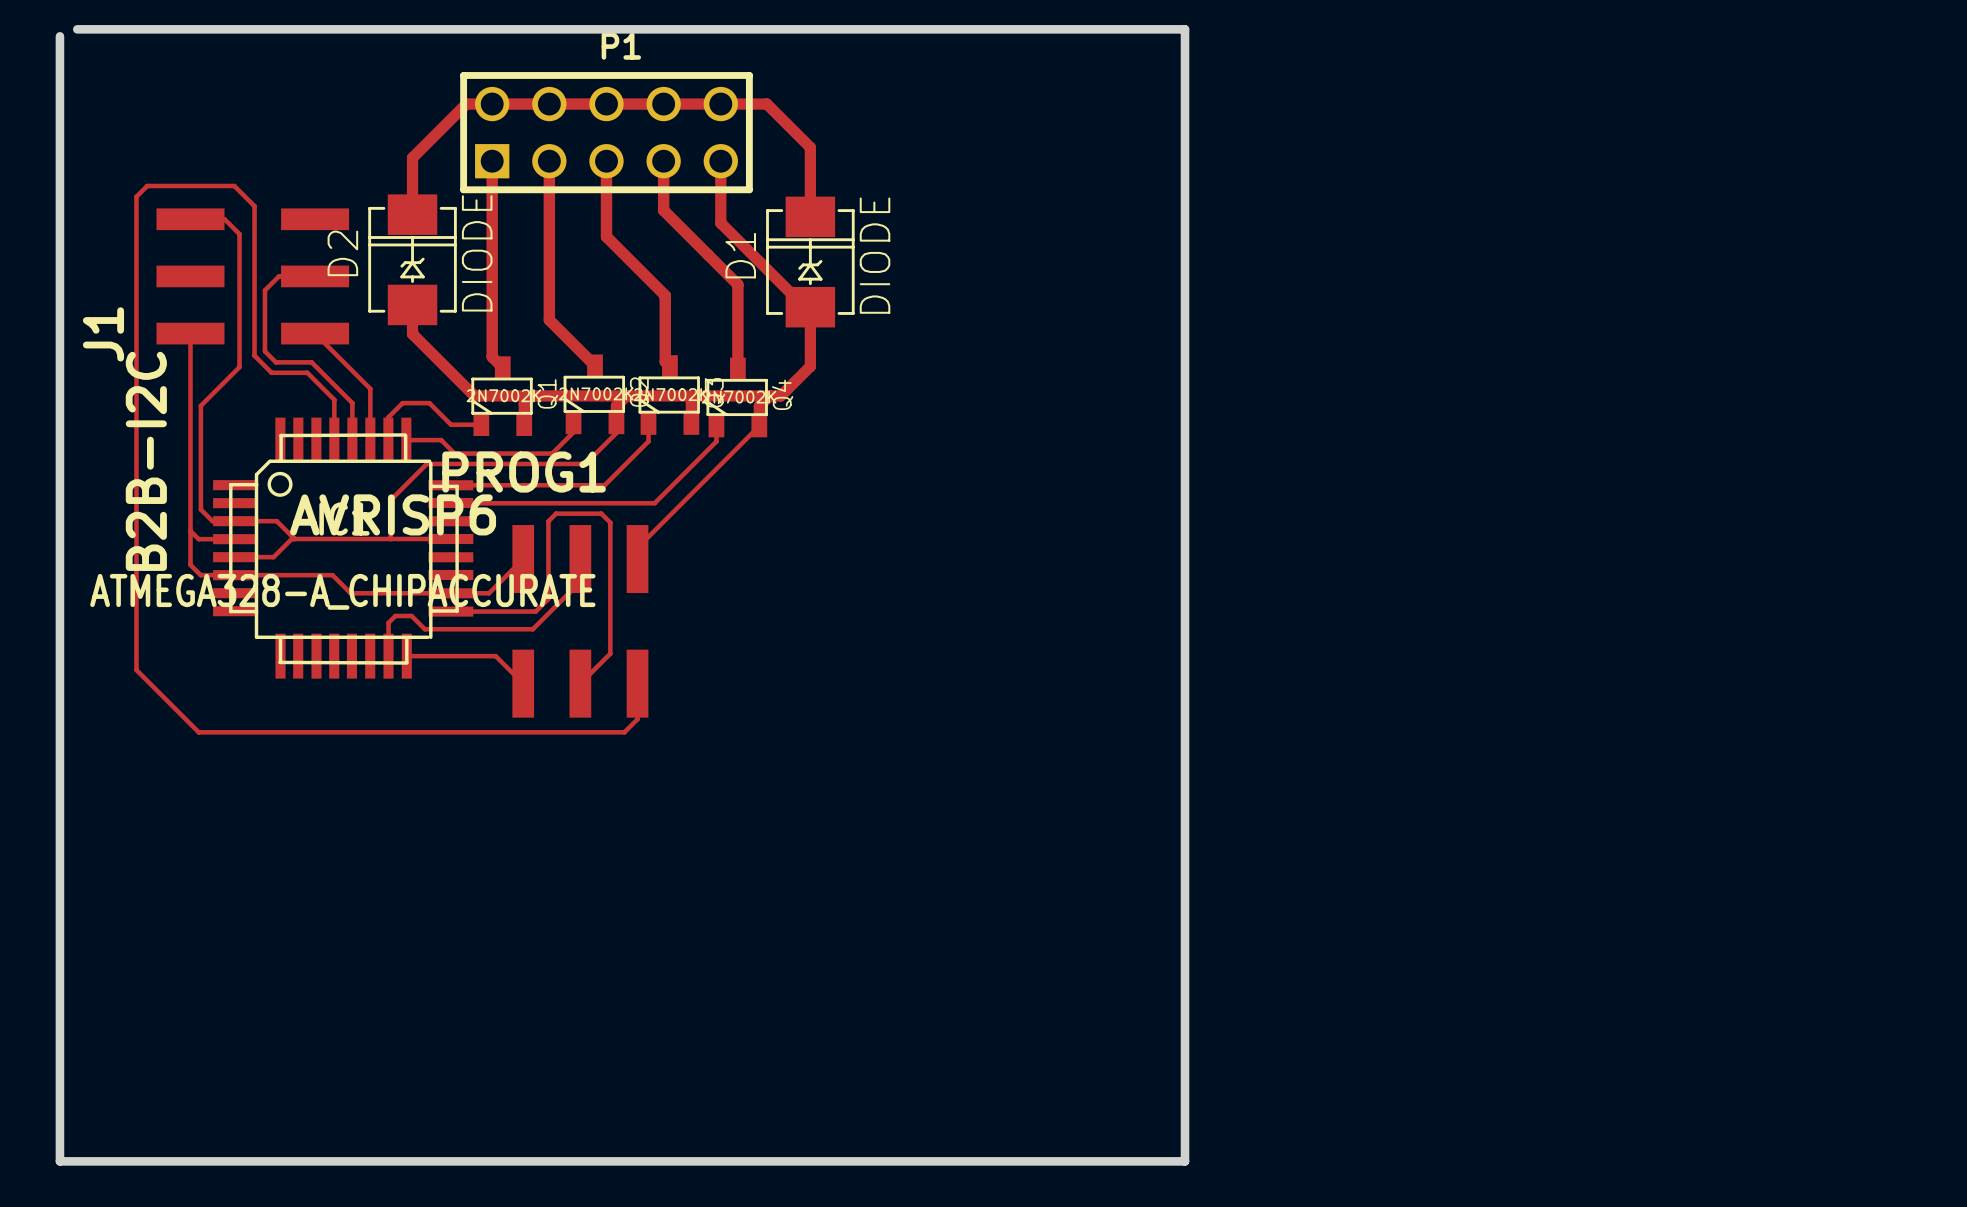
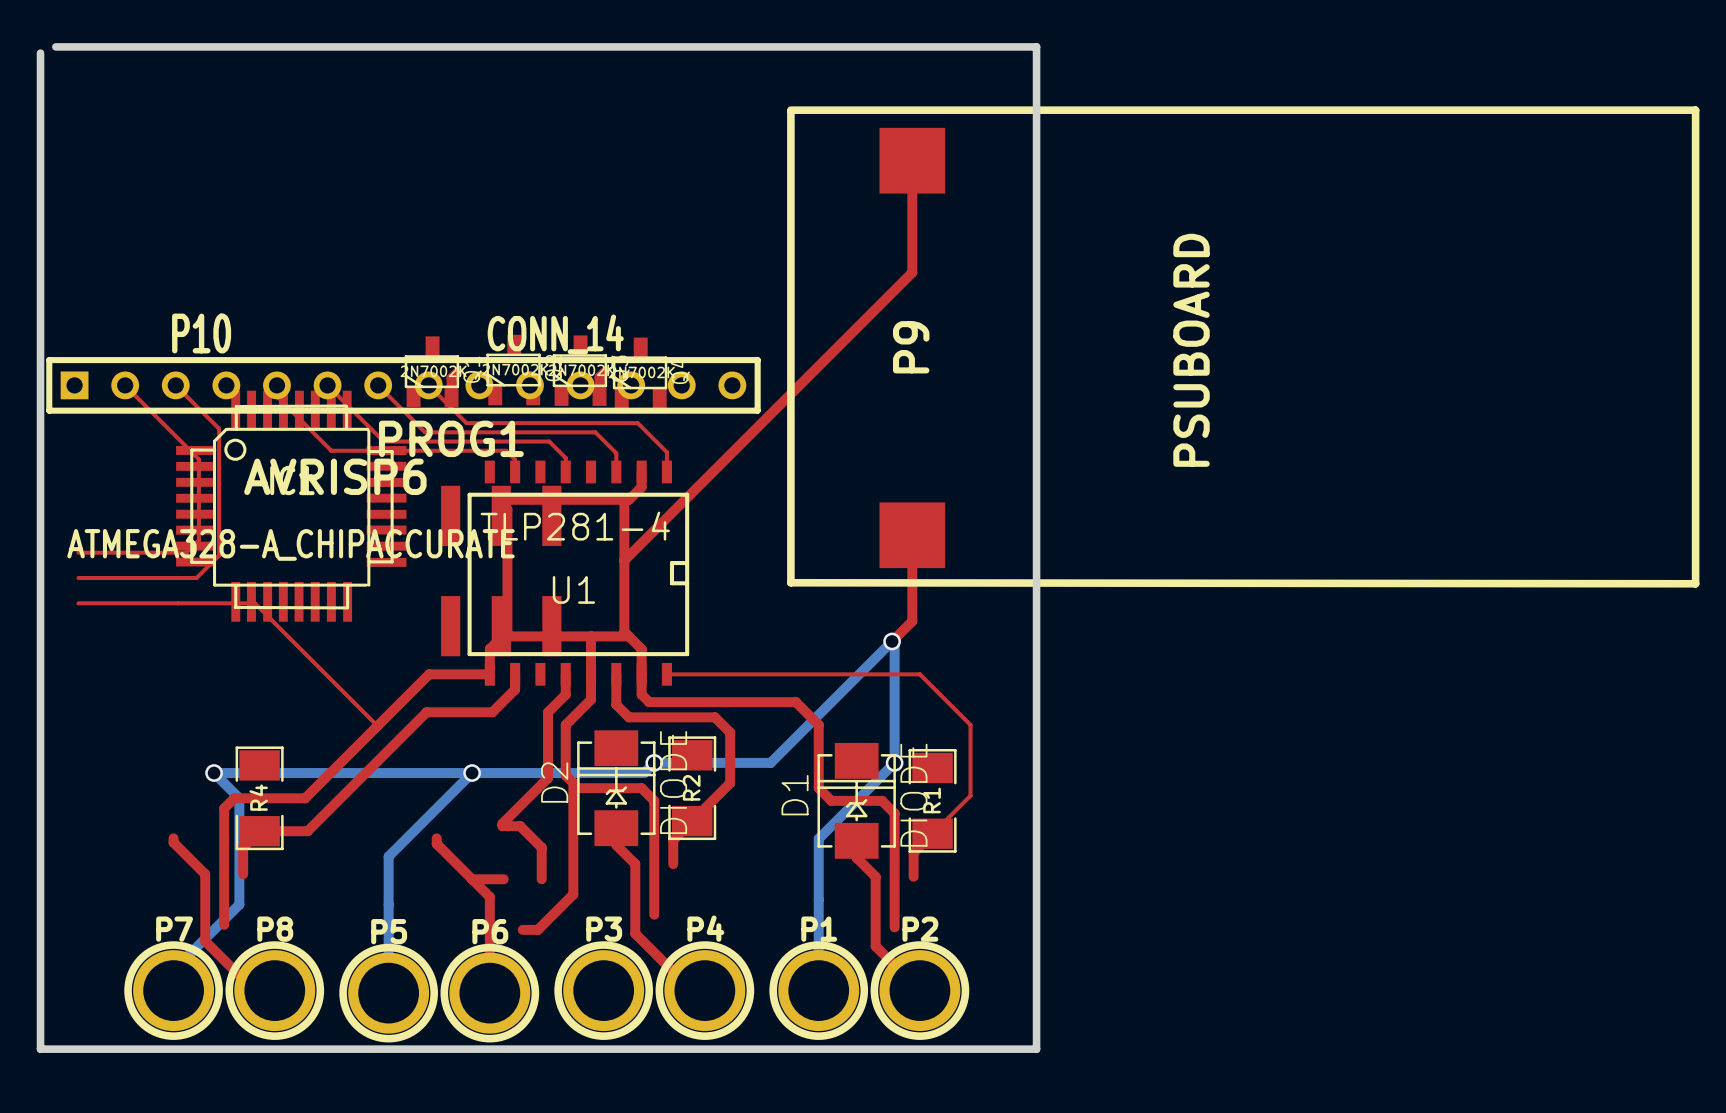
P1 footprint: [460, 72, 753, 194] -> [769, 941, 869, 1040]
top track: none -> (912, 160) (912, 272) (624, 560)
top track: (492, 161) (492, 357) (502, 367) -> none
top track: (549, 161) (549, 320) (595, 365) -> none
top track: (606, 161) (606, 236) (665, 295) (665, 361) (669, 366) -> none
top track: (663, 161) (663, 210) (737, 284) (737, 368) -> none
top track: (720, 161) (720, 223) (804, 307) (810, 307) (810, 366) (780, 395) (474, 395) (412, 334) (412, 304) -> none
top track: (412, 214) (412, 157) (466, 104) (766, 104) (810, 147) (810, 216) -> none
top track: (190, 219) (224, 219) (239, 234) (239, 367) (200, 405) (200, 509) (212, 521) (276, 521) (294, 538) -> none
D2 position: (412, 259) -> (616, 788)
D1 position: (810, 262) -> (856, 800)
J1: B2B-I2C (252, 276) -> none
top track: (315, 276) (278, 276) (264, 290) (264, 351) (275, 362) (311, 362) (352, 403) (352, 440) -> none
top track: (190, 333) (190, 564) (200, 575) (332, 575) (350, 593) (488, 593) (523, 559) -> none
top track: (315, 333) (370, 388) (370, 440) -> none
P9: none -> PSUBOARD (1243, 346)
top track: (626, 395) (616, 405) (616, 433) (585, 463) (426, 463) (390, 500) (390, 538) -> none
top track: (769, 395) (759, 406) (759, 426) (637, 547) (637, 559) -> none
top track: none -> (125, 385) (198, 459) (198, 540) (186, 552) (78, 552)
top track: none -> (175, 385) (219, 428) (219, 555) (196, 578) (78, 578)
top track: none -> (276, 385) (276, 396) (331, 450) (506, 450) (515, 459) (515, 471)
top track: none -> (327, 385) (383, 441) (549, 441) (565, 457) (565, 471)
top track: none -> (378, 385) (425, 432) (595, 432) (616, 453) (616, 471)
P10: none -> CONN_14 (403, 385)
top track: none -> (428, 385) (466, 423) (637, 423) (666, 452) (666, 471)
top track: (573, 422) (573, 432) (552, 453) (454, 453) (441, 440) (406, 440) -> none
top track: (648, 423) (648, 441) (604, 485) (450, 485) -> none
top track: (481, 424) (451, 424) (429, 403) (402, 403) (388, 417) (388, 440) -> none
top track: (716, 426) (716, 441) (654, 503) (451, 503) -> none
top track: (334, 440) (334, 399) (307, 372) (271, 372) (254, 355) (254, 206) (234, 186) (147, 186) (136, 196) (136, 670) (198, 732) (624, 732) (637, 719) (637, 683) -> none
top track: none -> (641, 471) (641, 487) (628, 499) (497, 499) (507, 509) (507, 636)
top track: (190, 530) (198, 539) (235, 539) -> none
top track: (450, 538) (293, 537) (273, 557) (235, 557) -> none
top track: none -> (624, 499) (624, 631) (641, 649) (641, 694) (649, 702) (795, 702) (818, 724) (818, 788) (831, 800) (881, 800) (894, 813) (894, 927)
top track: (580, 559) (580, 581) (532, 629) (424, 629) (411, 615) (395, 615) (388, 622) (388, 656) -> none
top track: none -> (912, 535) (912, 621) (892, 641)
top track: (450, 611) (535, 611) (548, 598) (548, 521) (556, 513) (601, 513) (610, 522) (610, 653) (580, 683) -> none
U1: none -> TLP281-4 (578, 573)
top track: (406, 656) (495, 656) (523, 683) -> none
top track: none -> (78, 603) (254, 603) (377, 725)
top track: none -> (591, 636) (591, 699) (565, 724) (565, 775) (578, 788) (641, 788) (654, 800) (654, 914)
top track: none -> (628, 636) (502, 636) (489, 649) (489, 674) (429, 674) (305, 798) (234, 798) (224, 808) (224, 924)
via: none -> (892, 641)
top track: none -> (515, 674) (515, 689) (492, 712) (426, 712) (307, 831) (259, 831) (243, 847) (243, 874)
top track: none -> (565, 674) (565, 694) (548, 712) (548, 778) (502, 823) (502, 826) (520, 826) (541, 847) (541, 879)
top track: none -> (616, 674) (616, 704) (628, 717) (715, 717) (730, 732) (730, 783) (673, 840) (673, 864)
top track: none -> (666, 674) (919, 674) (970, 724) (970, 795) (913, 852) (913, 876)
via: none -> (654, 762)
via: none -> (894, 762)
via: none -> (214, 773)
bottom track: none -> (472, 773) (388, 856) (388, 993)
via: none -> (472, 773)
top track: none -> (573, 783) (573, 894) (537, 929) (522, 929)
R2: none -> (692, 788)
R4: none -> (259, 798)
R1: none -> (932, 800)
top track: none -> (616, 828) (616, 845) (635, 864) (635, 933) (692, 990) (704, 990)
top track: none -> (173, 838) (173, 842) (205, 874) (205, 941) (254, 990) (274, 990)
top track: none -> (436, 838) (436, 843) (489, 896) (489, 993)
top track: none -> (856, 840) (856, 857) (875, 876) (875, 946) (919, 990)
top track: none -> (472, 879) (503, 879)
bottom track: none -> (173, 990) (173, 970) (239, 904) (239, 798) (214, 773) (644, 773) (654, 762) (770, 762) (892, 641) (894, 643) (894, 762) (818, 838) (818, 990)
P7: none -> (173, 990)
P8: none -> (274, 990)
P3: none -> (603, 990)
P4: none -> (704, 990)
P2: none -> (919, 990)
P5: none -> (388, 993)
P6: none -> (489, 993)

